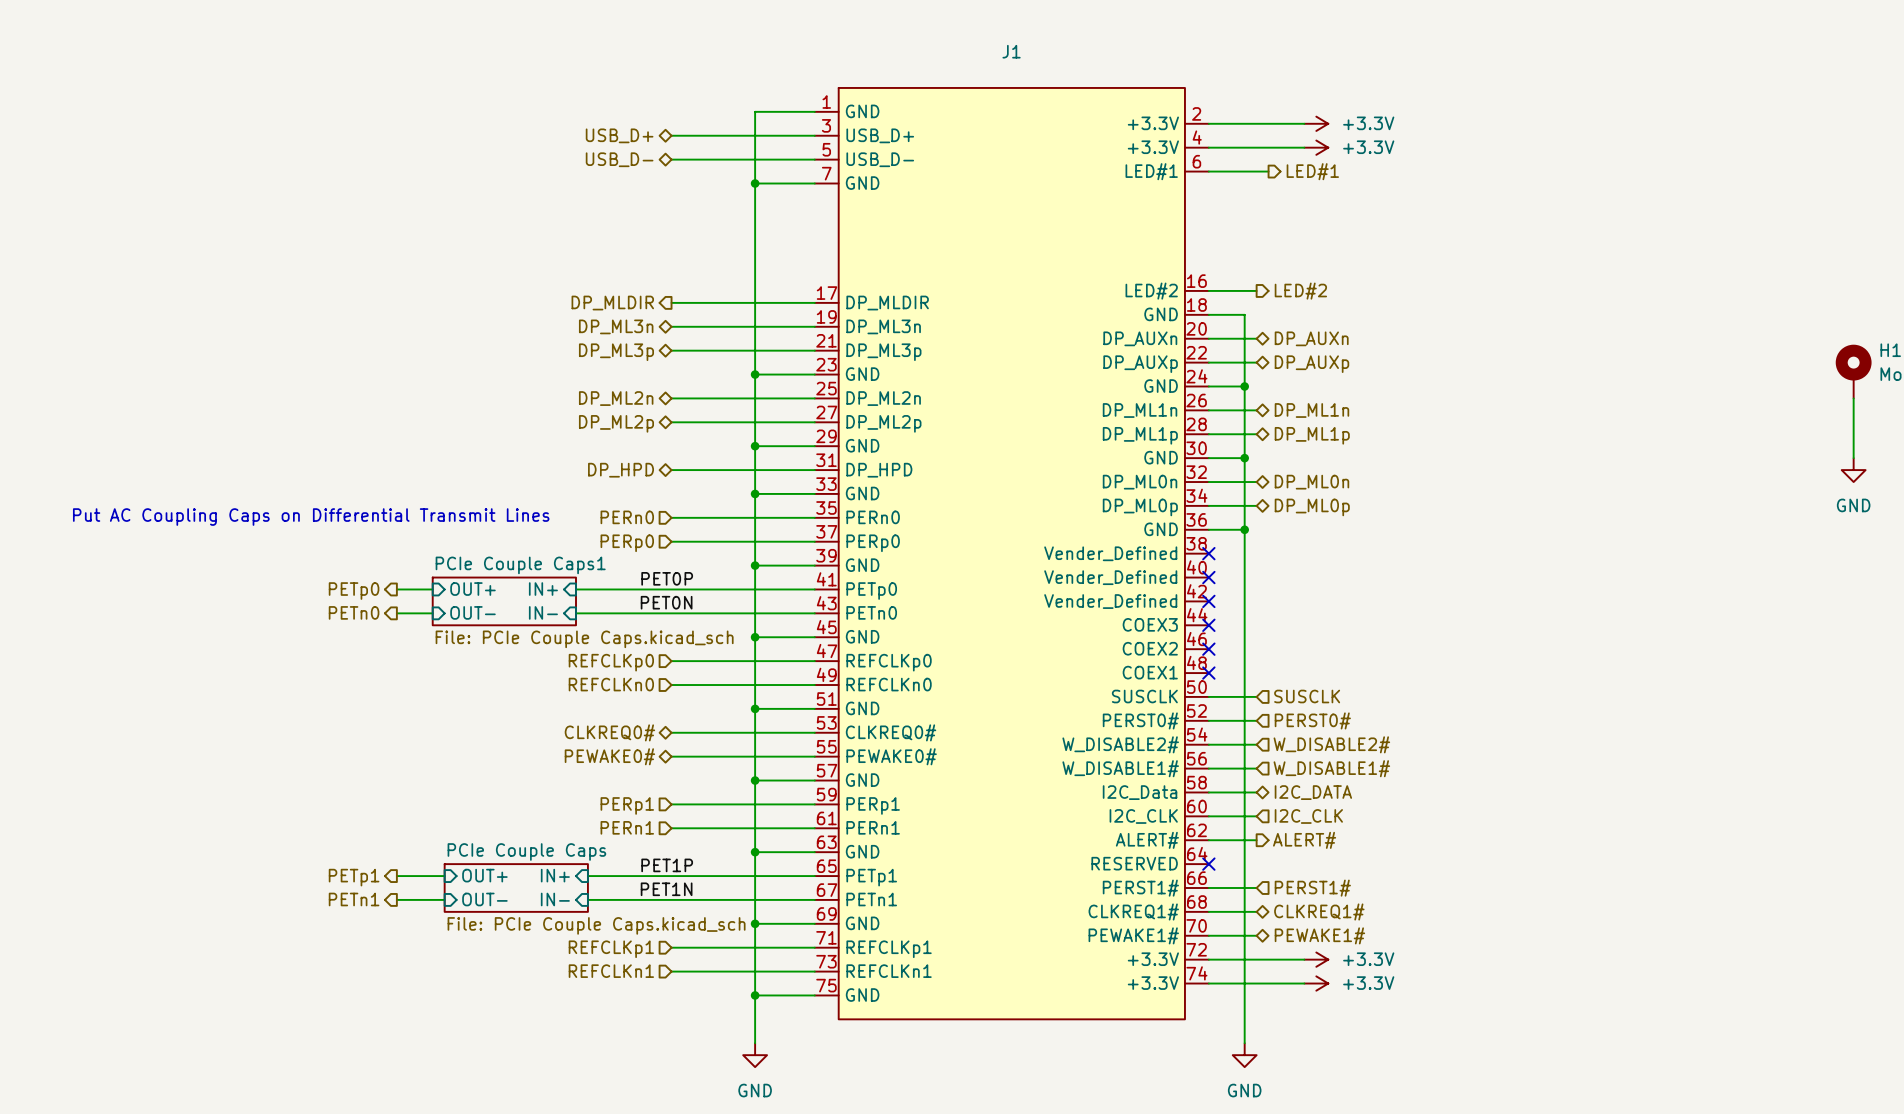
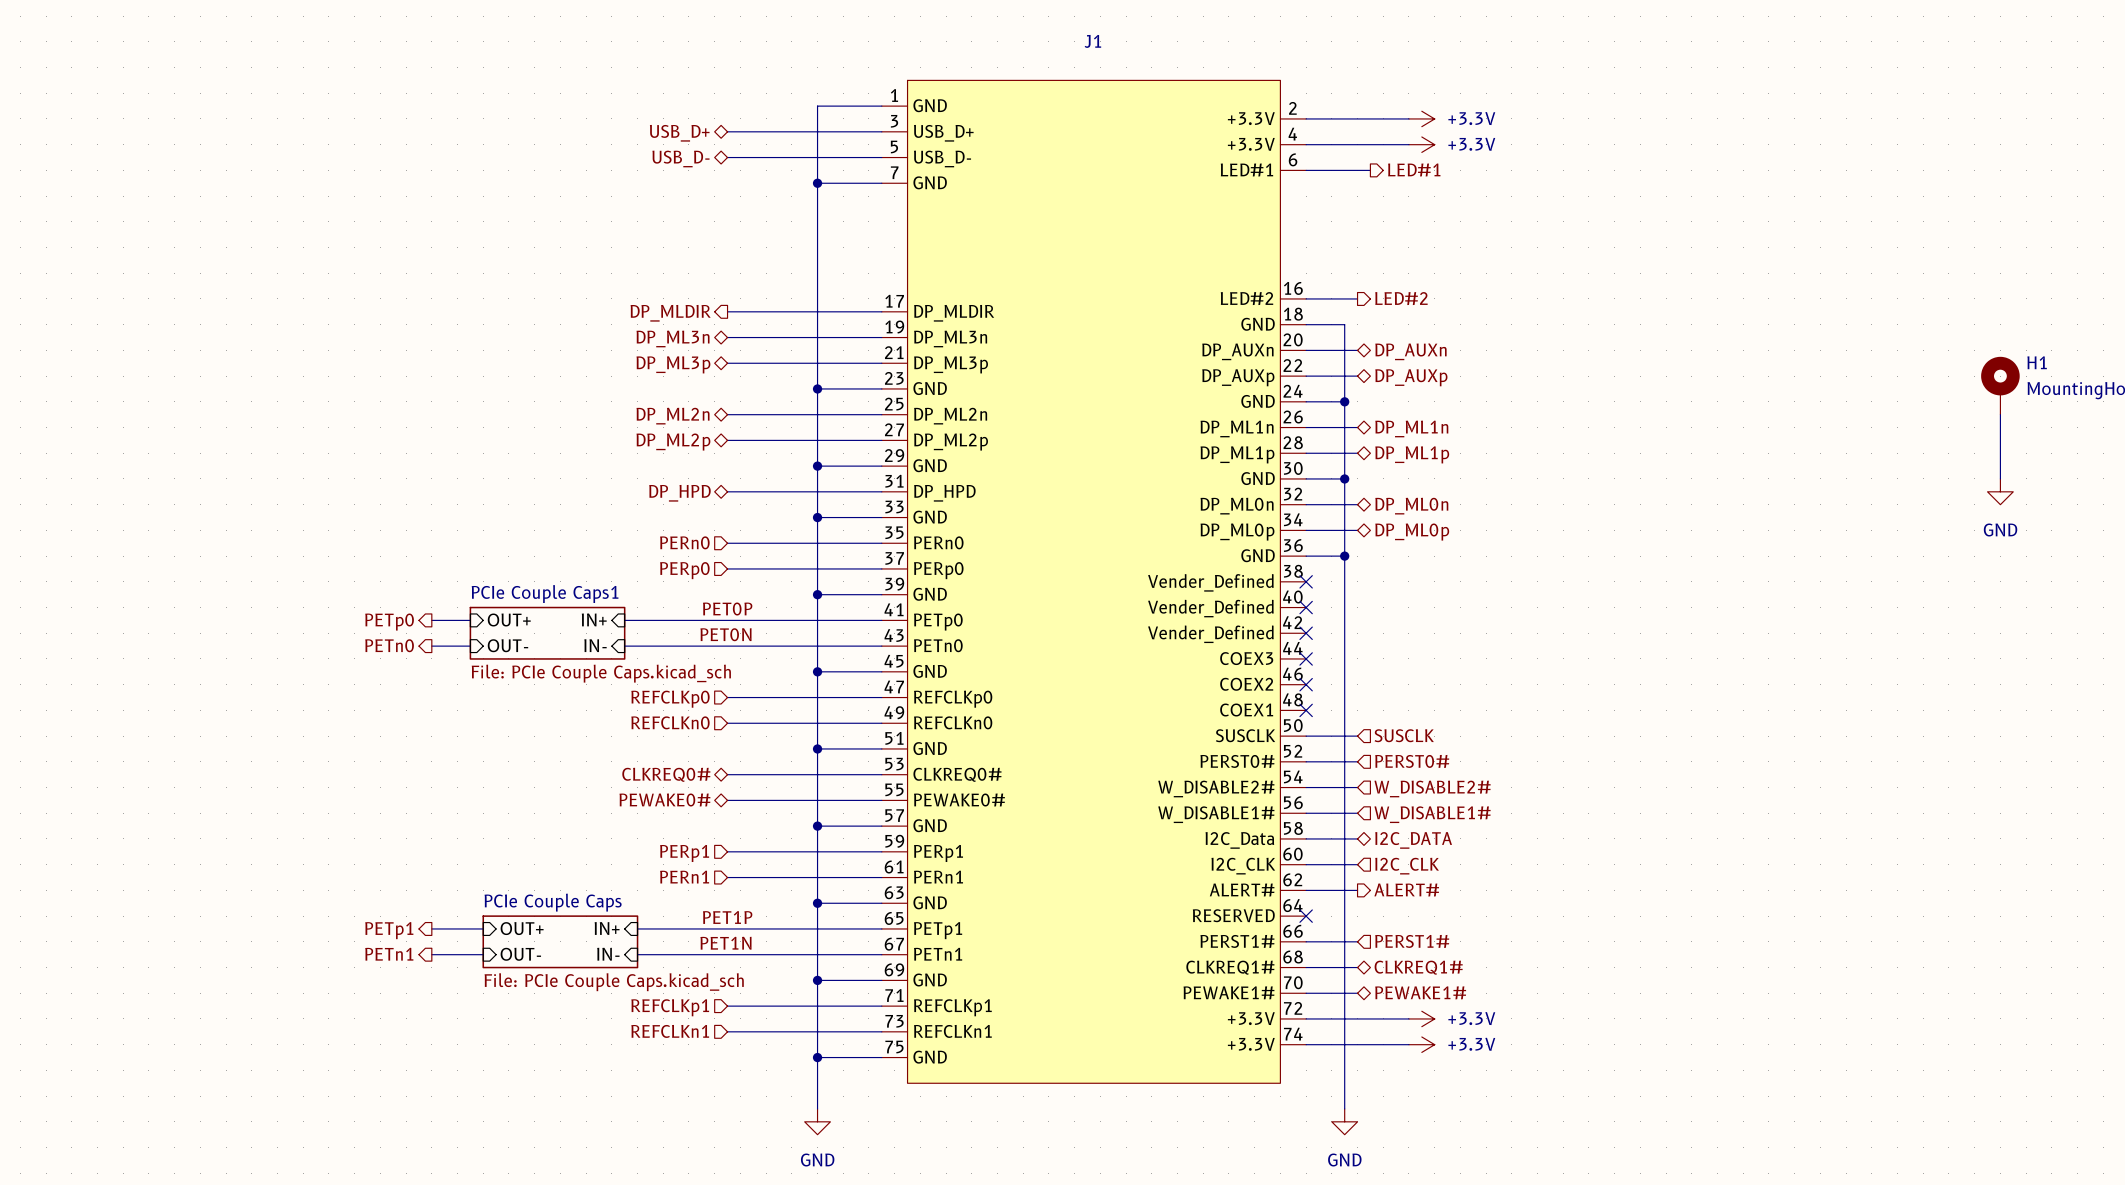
text: Put AC Coupling Caps on Differential Transmit Lines (311, 517) -> none

